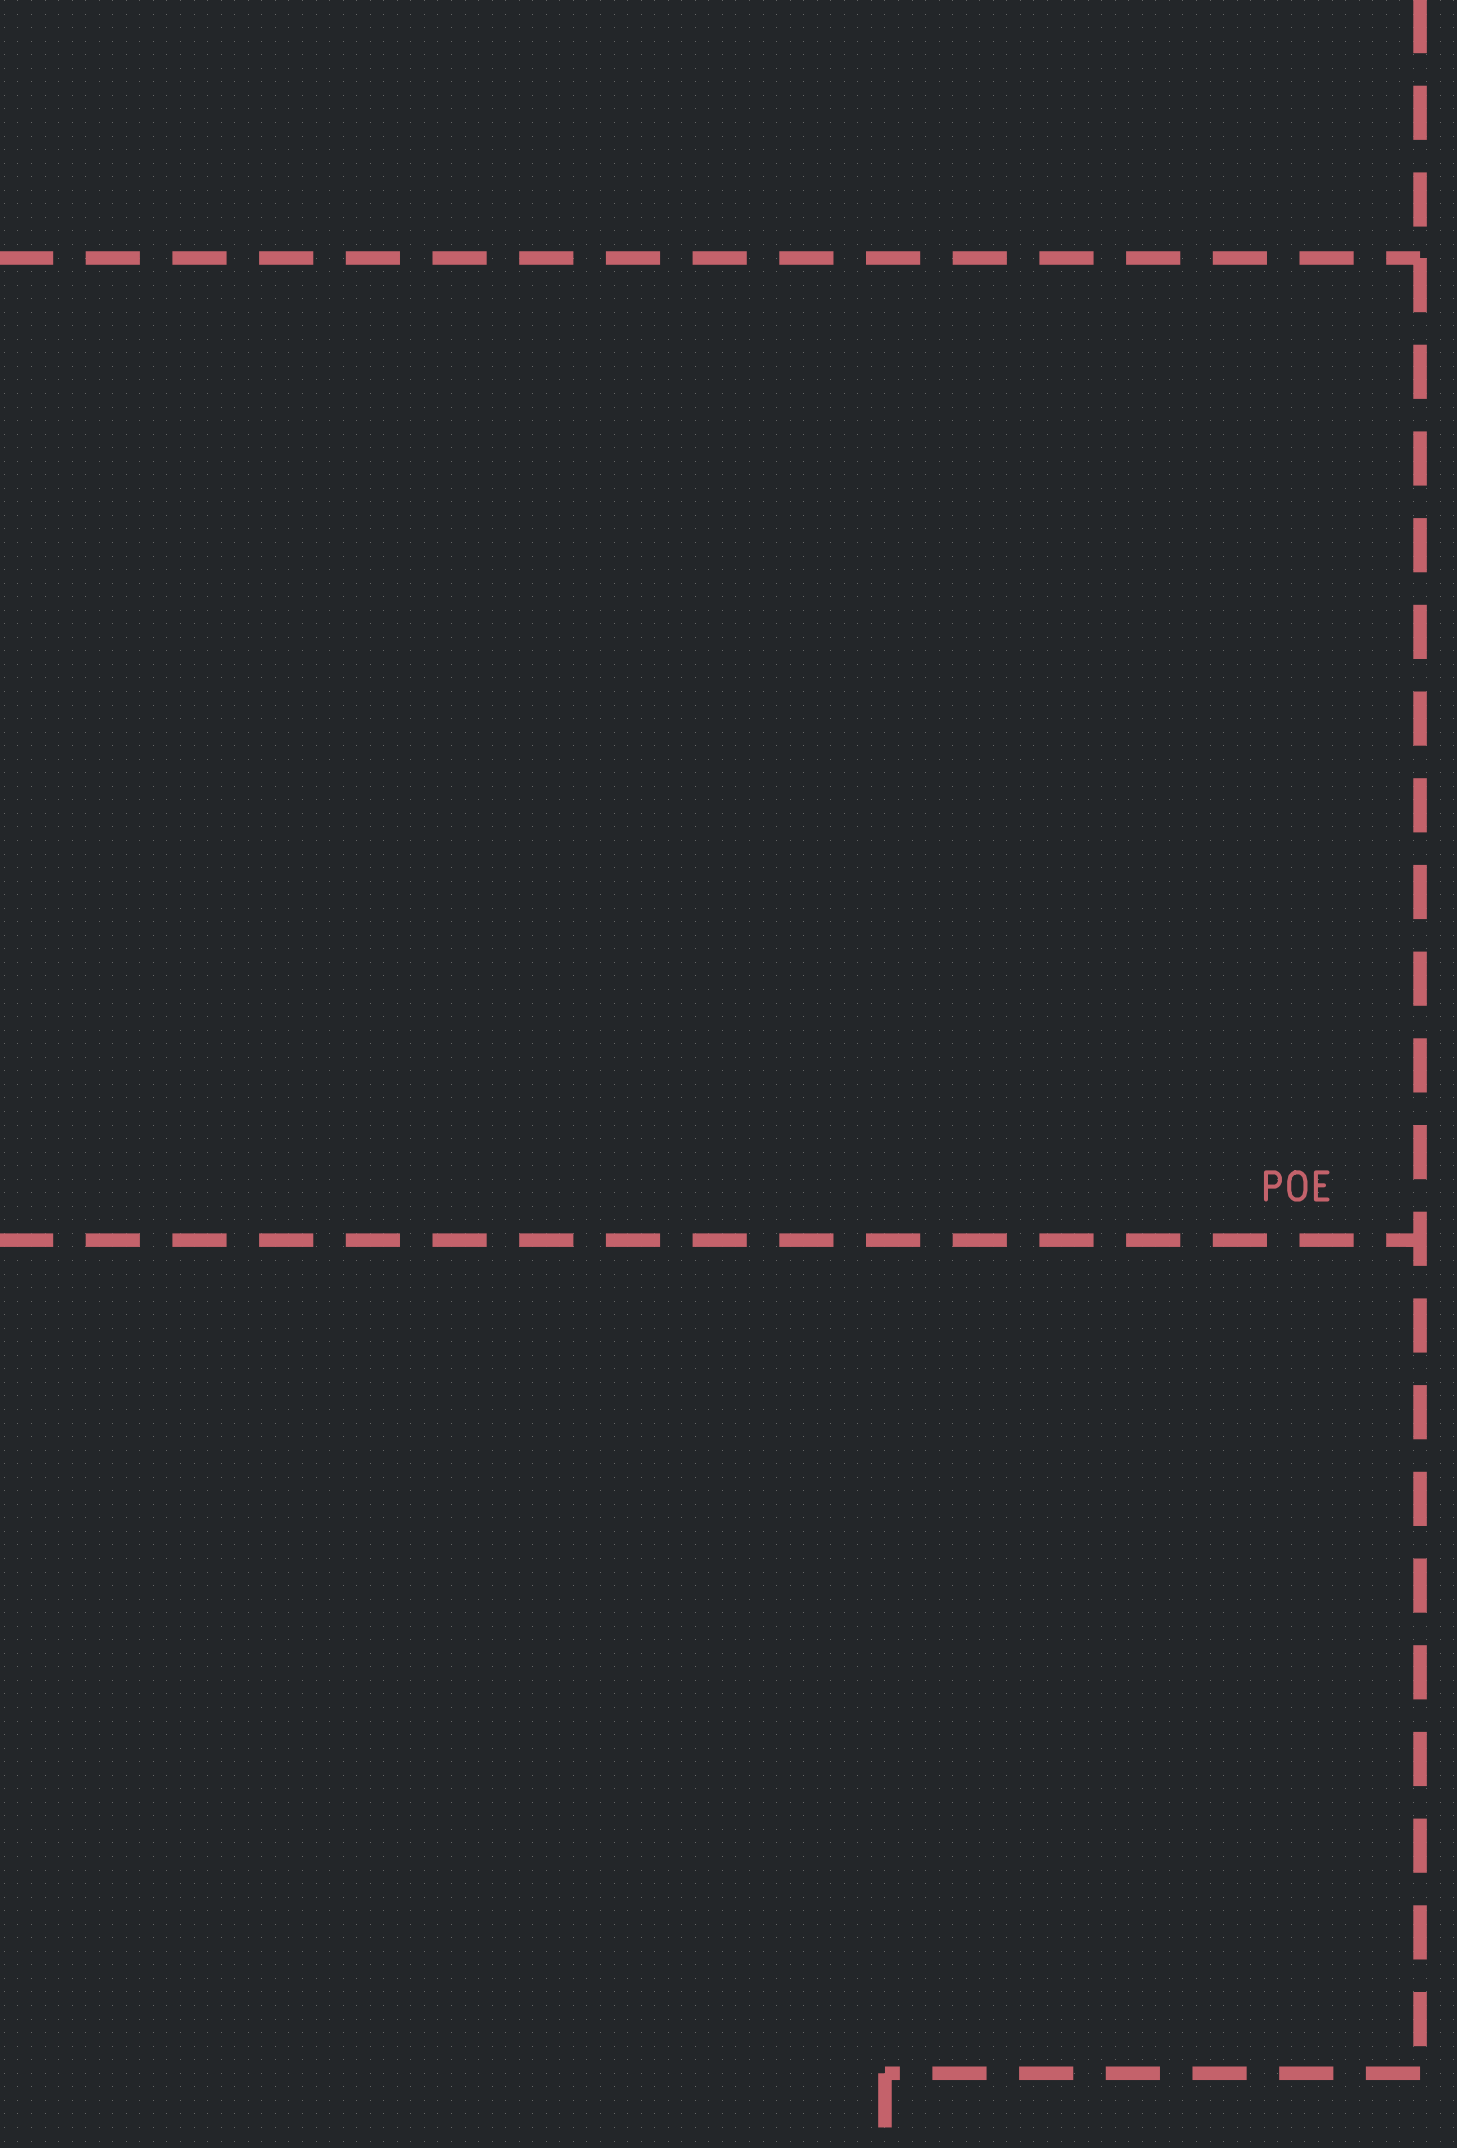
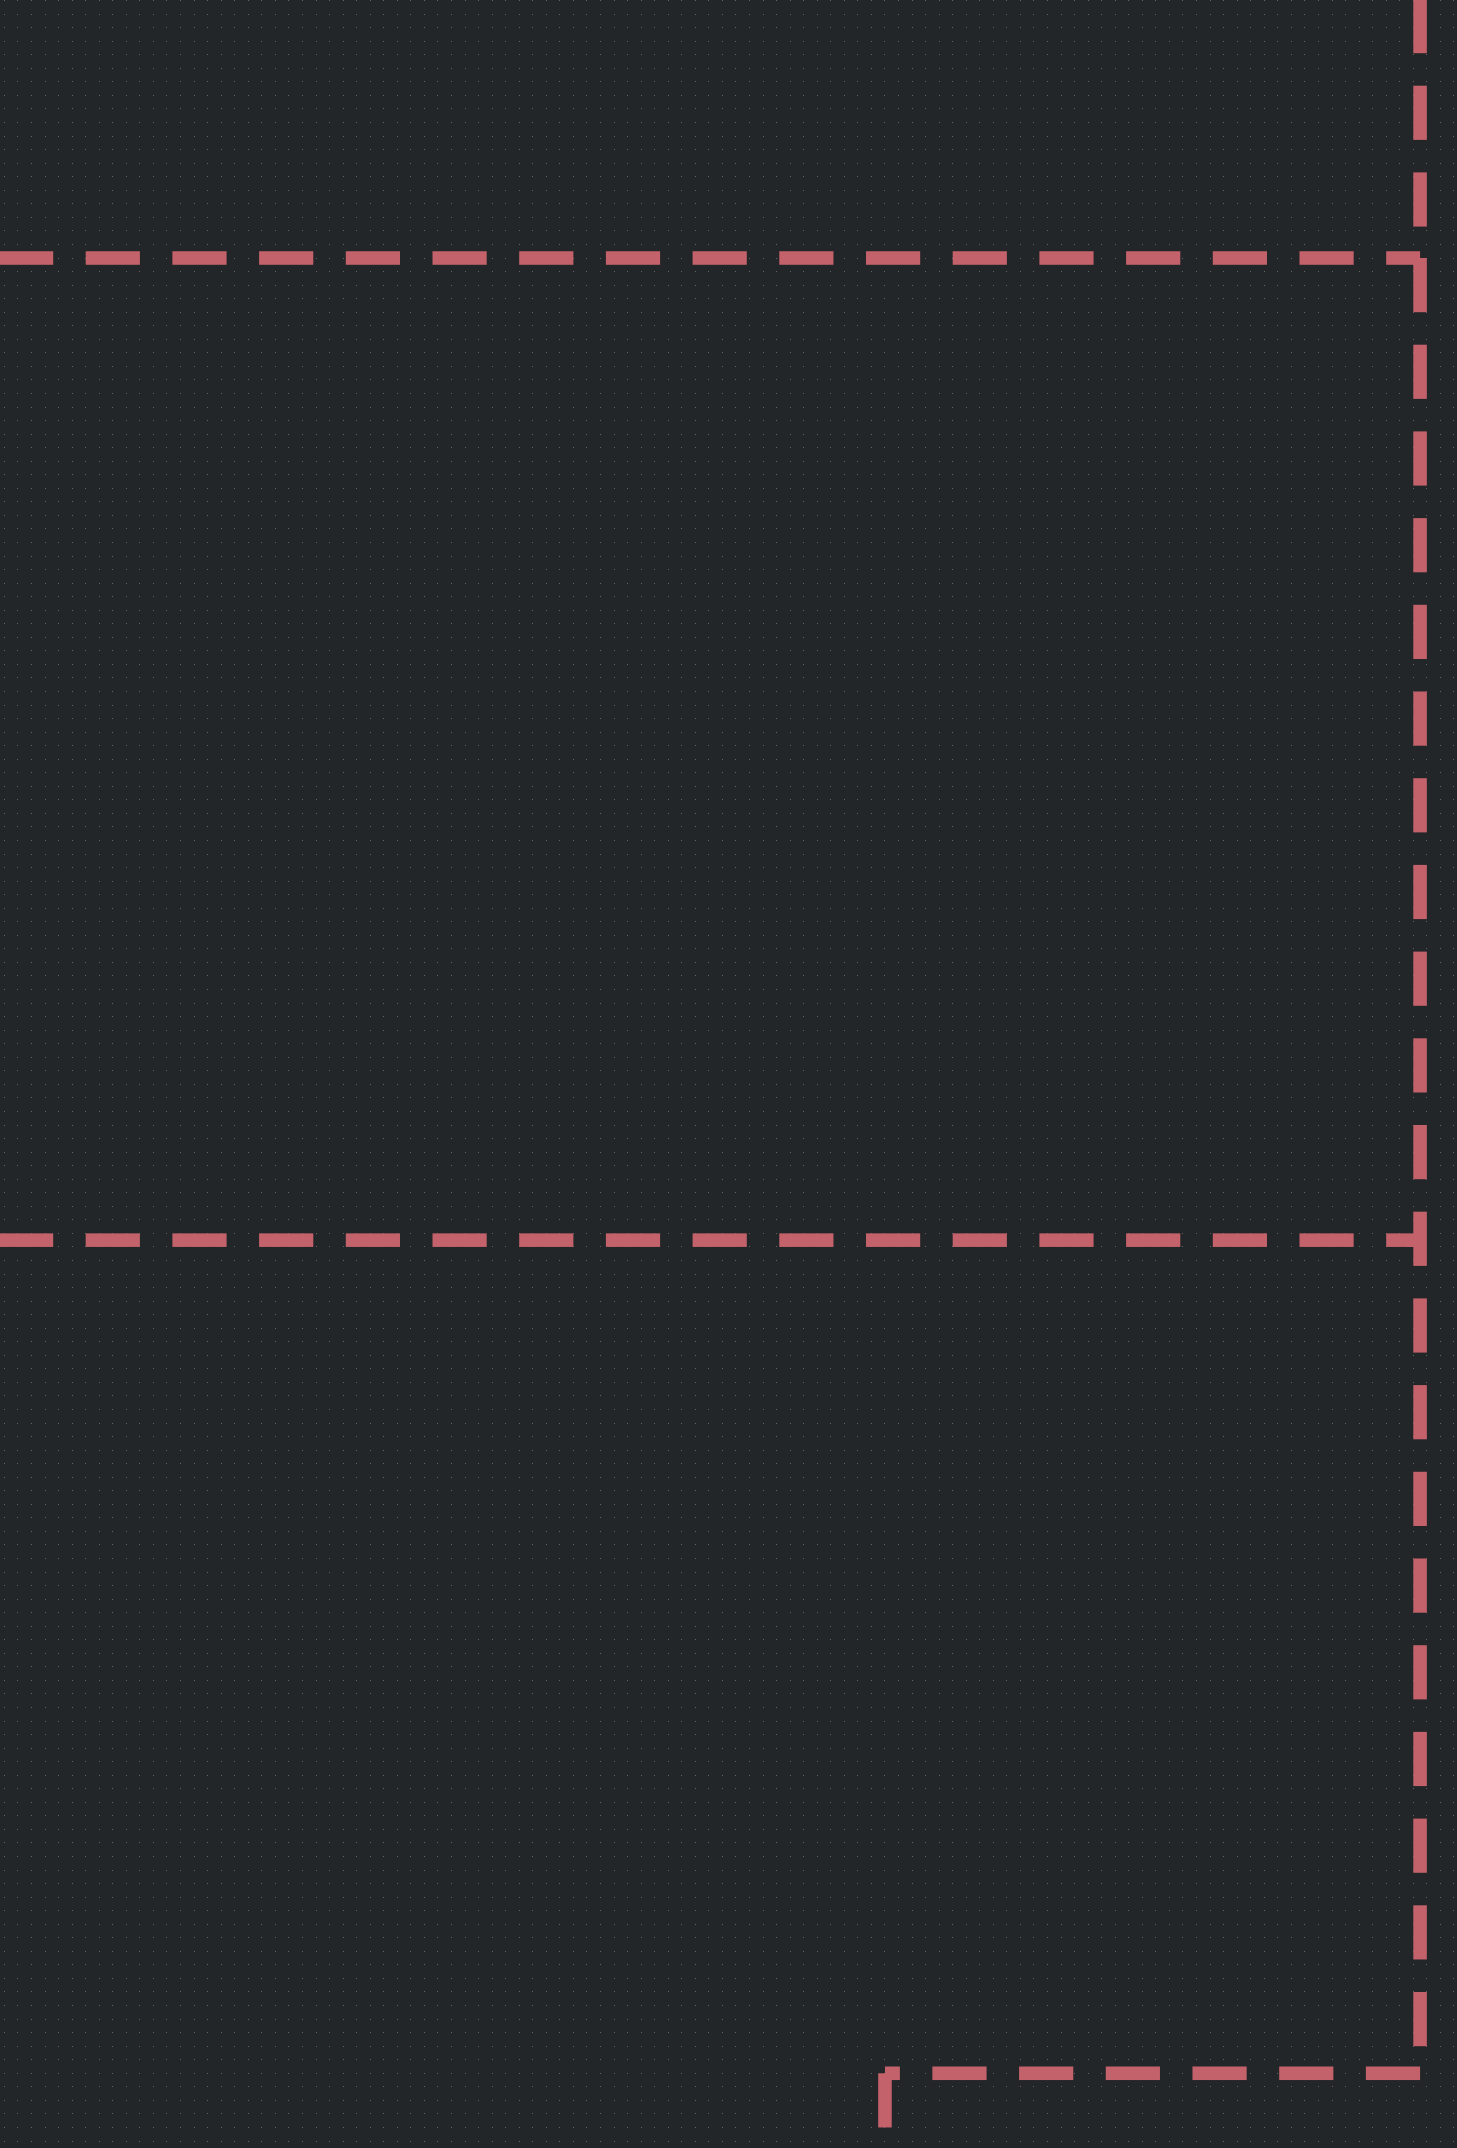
text: POE (1296, 1185) -> none

